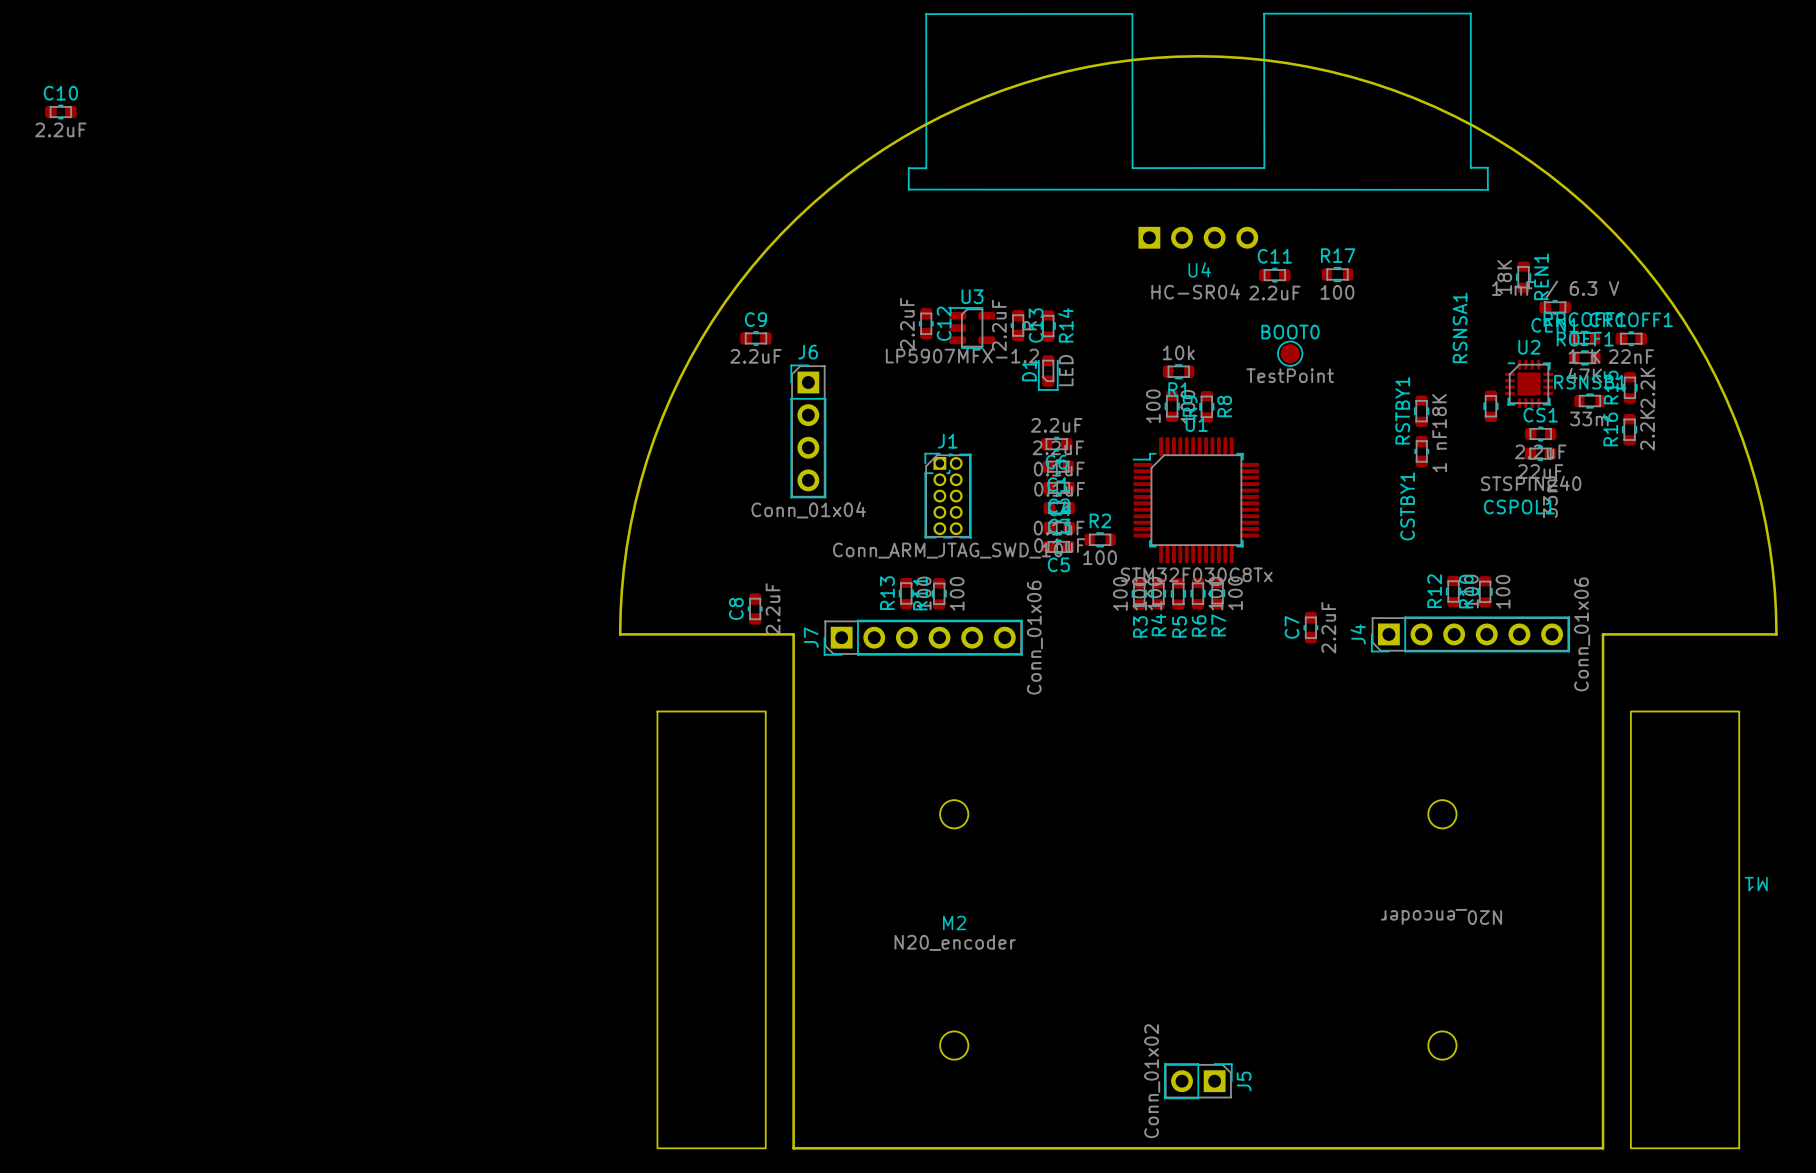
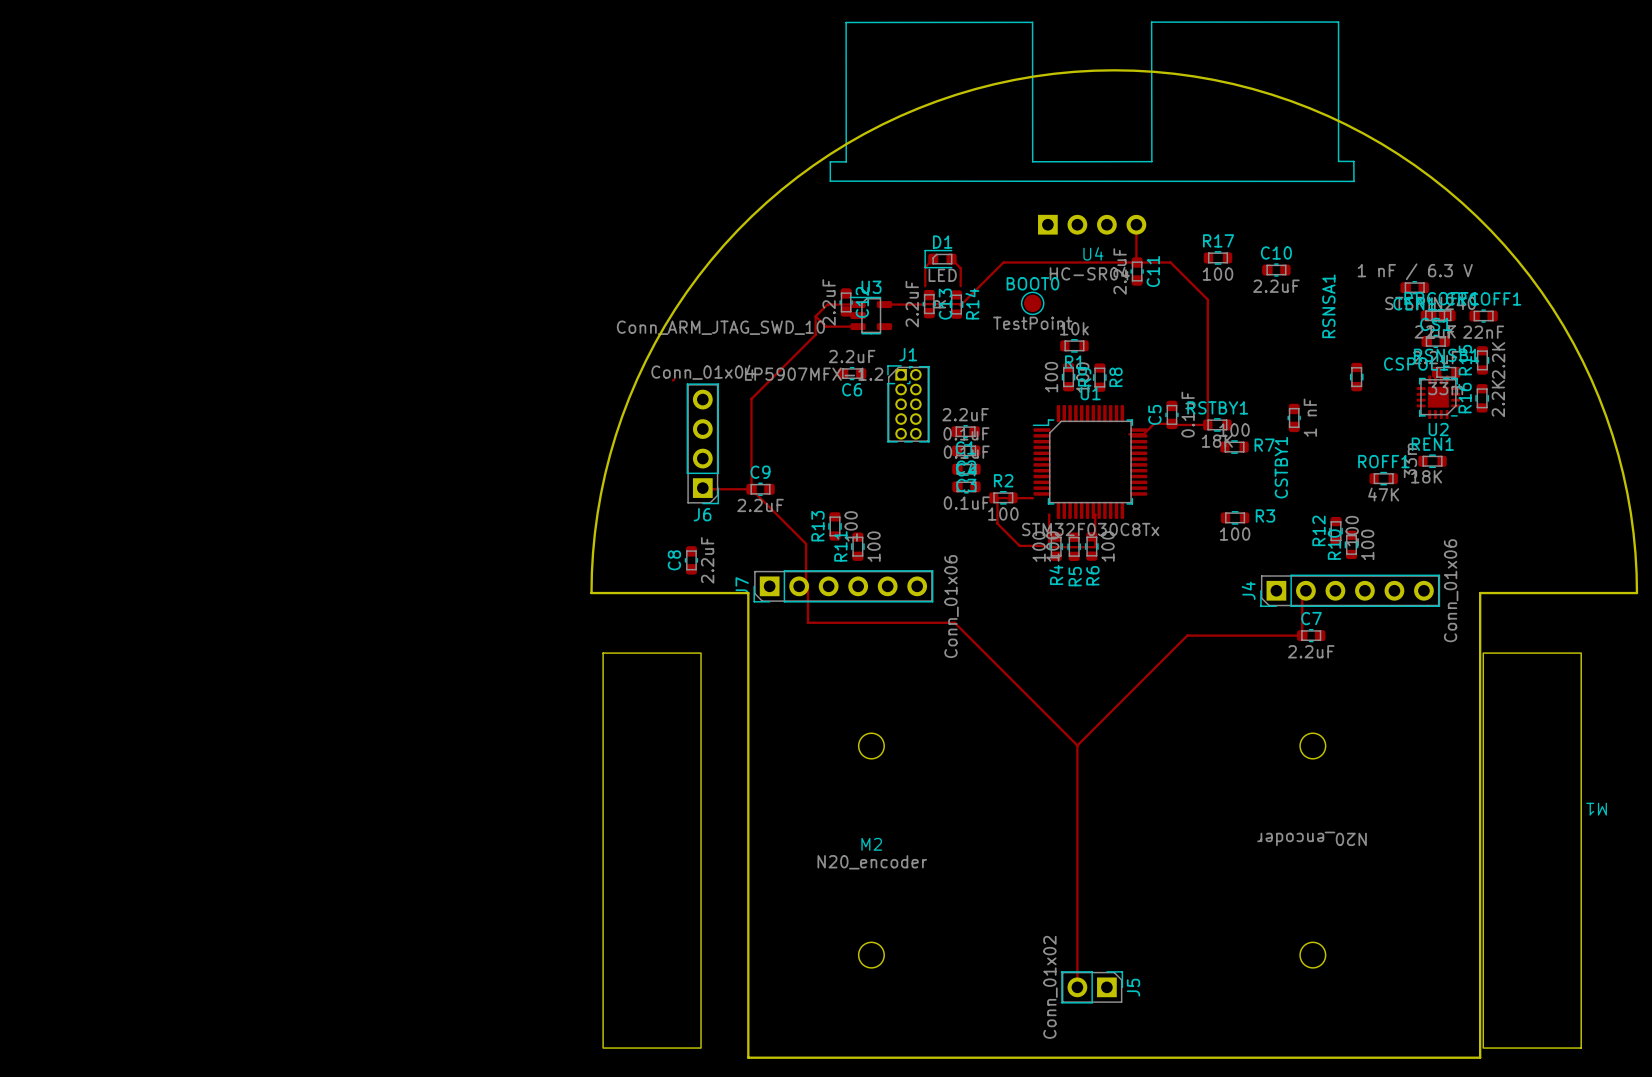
C10 position: (60, 112) -> (1276, 270)
track: none -> (1136, 224) (1137, 262)
track: none -> (933, 259) (925, 267) (925, 286)
track: none -> (951, 259) (960, 268) (960, 286)
C11 rotation: 0° (1274, 275) -> 90° clockwise (1137, 271)
C11 position: (1274, 275) -> (1137, 271)
REN1 name position: REN1 (1541, 276) -> REN1 (1432, 444)
REN1 rotation: 0° (1523, 277) -> 90° clockwise (1432, 461)
REN1 position: (1523, 277) -> (1432, 461)
track: none -> (858, 304) (827, 304) (815, 316)
track: none -> (884, 304) (960, 305) (1003, 262) (1170, 262) (1207, 299) (1207, 424) (1154, 423) (1143, 434) (1129, 434)
U3 position: (971, 328) -> (870, 315)
C9 position: (755, 338) -> (760, 489)
track: none -> (815, 316) (815, 334) (751, 398) (751, 489)
track: none -> (815, 316) (825, 326) (858, 326)
BOOT0 position: (1290, 353) -> (1032, 303)
U3 value position: LP5907MFX-1.2 (962, 356) -> LP5907MFX-1.2 (814, 374)
ROFF1 position: (1584, 357) -> (1383, 478)
D1 rotation: 0° (1048, 372) -> 90° clockwise (940, 259)
D1 position: (1048, 372) -> (940, 259)
U2 rotation: 0° (1529, 383) -> 180° (1438, 397)
U2 position: (1529, 383) -> (1438, 397)
track: none -> (674, 379) (673, 380)
RSTBY1 rotation: 0° (1421, 411) -> 90° clockwise (1217, 424)
RSTBY1 position: (1421, 411) -> (1217, 424)
J6 rotation: 0° (808, 431) -> 180° (702, 443)
CS1 position: (1540, 433) -> (1435, 341)
C6 position: (1056, 444) -> (852, 373)
CSPOL1 position: (1540, 453) -> (1435, 315)
J1 position: (948, 495) -> (908, 403)
track: none -> (704, 489) (751, 489)
track: none -> (751, 489) (806, 543) (806, 591)
track: none -> (1032, 498) (997, 498) (997, 523) (1019, 545) (1094, 547) (1095, 514)
C5 rotation: 0° (1058, 546) -> 90° clockwise (1171, 414)
C5 position: (1058, 546) -> (1171, 414)
J1 value position: Conn_ARM_JTAG_SWD_10 (948, 550) -> Conn_ARM_JTAG_SWD_10 (720, 327)
track: none -> (1048, 514) (1049, 547)
R12 position: (1453, 591) -> (1336, 531)
R13 position: (906, 593) -> (835, 526)
R3 value position: 100 (1120, 593) -> 100 (1235, 534)
R3 rotation: 0° (1139, 593) -> 90° clockwise (1235, 517)
R3 position: (1139, 593) -> (1235, 517)
R7 rotation: 0° (1217, 593) -> 90° clockwise (1234, 447)
R7 position: (1217, 593) -> (1234, 447)
R7 value position: 100 (1235, 593) -> 100 (1234, 430)
R7 name position: R7 (1218, 625) -> R7 (1264, 445)
R3 name position: R3 (1140, 626) -> R3 (1265, 515)
C7 rotation: 0° (1310, 627) -> 90° clockwise (1311, 635)
C7 position: (1310, 627) -> (1311, 635)
track: none -> (806, 582) (808, 584) (808, 622) (954, 622) (1077, 745)
board edge: (620, 634) (793, 634) (793, 1148) (1603, 1148) (1603, 634) (1776, 634) (1772, 568) (1765, 524) (1755, 481) (1734, 418) (1716, 377) (1683, 320) (1658, 283) (1614, 233) (1566, 188) (1512, 149) (1474, 126) (1414, 98) (1351, 76) (1308, 66) (1264, 60) (1198, 56) (1154, 57) (1088, 66) (1045, 76) (982, 98) (922, 126) (884, 149) (830, 188) (797, 217) (752, 266) (725, 301) (701, 338) (670, 397) (654, 439) (635, 502) (624, 568) (620, 634) -> (591, 593) (748, 593) (748, 1057) (1480, 1057) (1480, 593) (1636, 593) (1633, 533) (1627, 493) (1612, 435) (1599, 397) (1582, 361) (1553, 308) (1529, 276) (1490, 230) (1446, 189) (1414, 165) (1363, 133) (1309, 108) (1271, 94) (1213, 79) (1154, 71) (1114, 70) (1054, 73) (1014, 79) (975, 88) (918, 108) (864, 133) (830, 154) (781, 189) (751, 216) (710, 260) (675, 308) (655, 343) (629, 397) (615, 435) (601, 493) (594, 533) (591, 593)
J4 position: (1470, 634) -> (1350, 590)
J7 value position: Conn_01x06 (1034, 637) -> Conn_01x06 (951, 606)
track: none -> (1305, 590) (1302, 594) (1302, 635) (1187, 635) (1077, 745)
track: none -> (1077, 745) (1077, 987)

